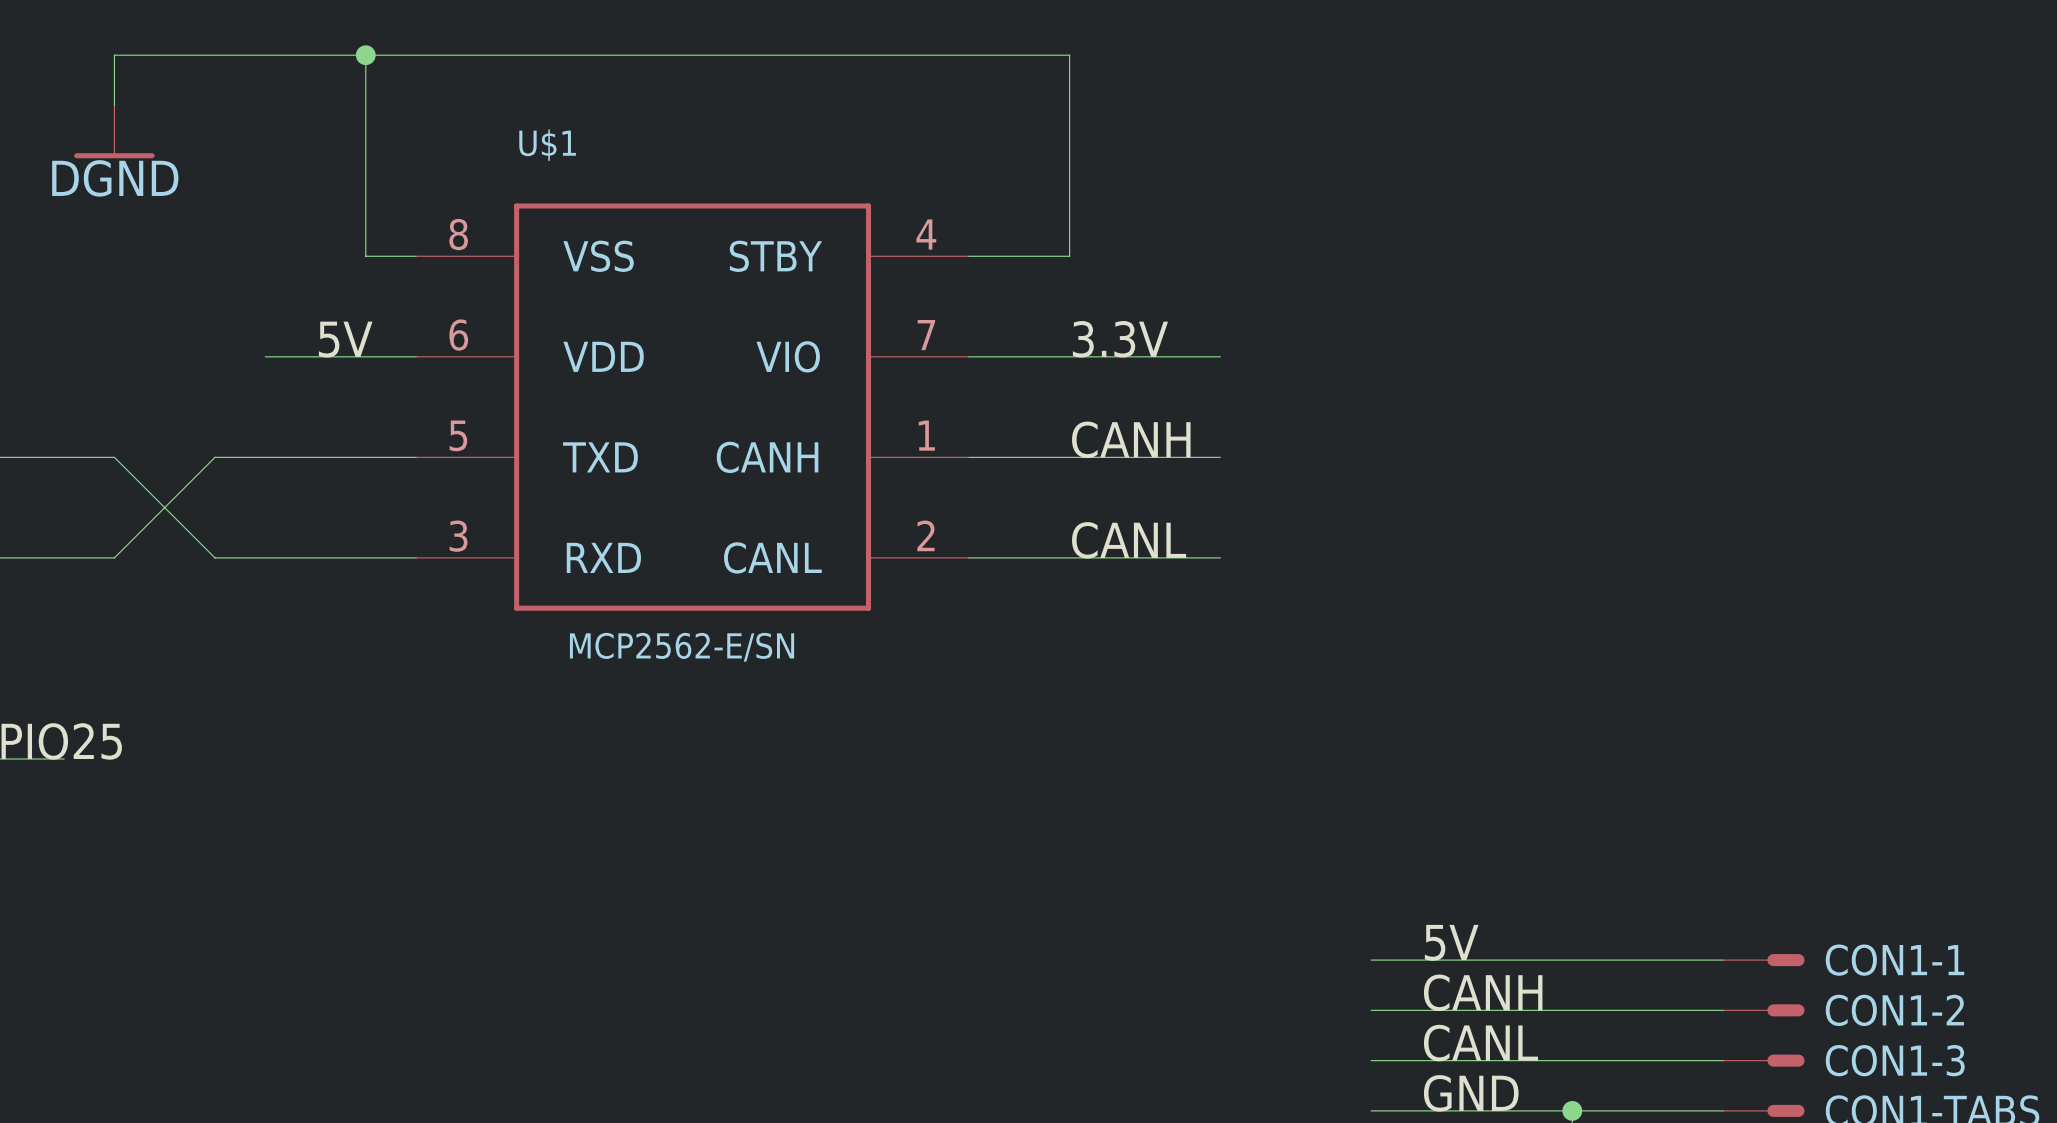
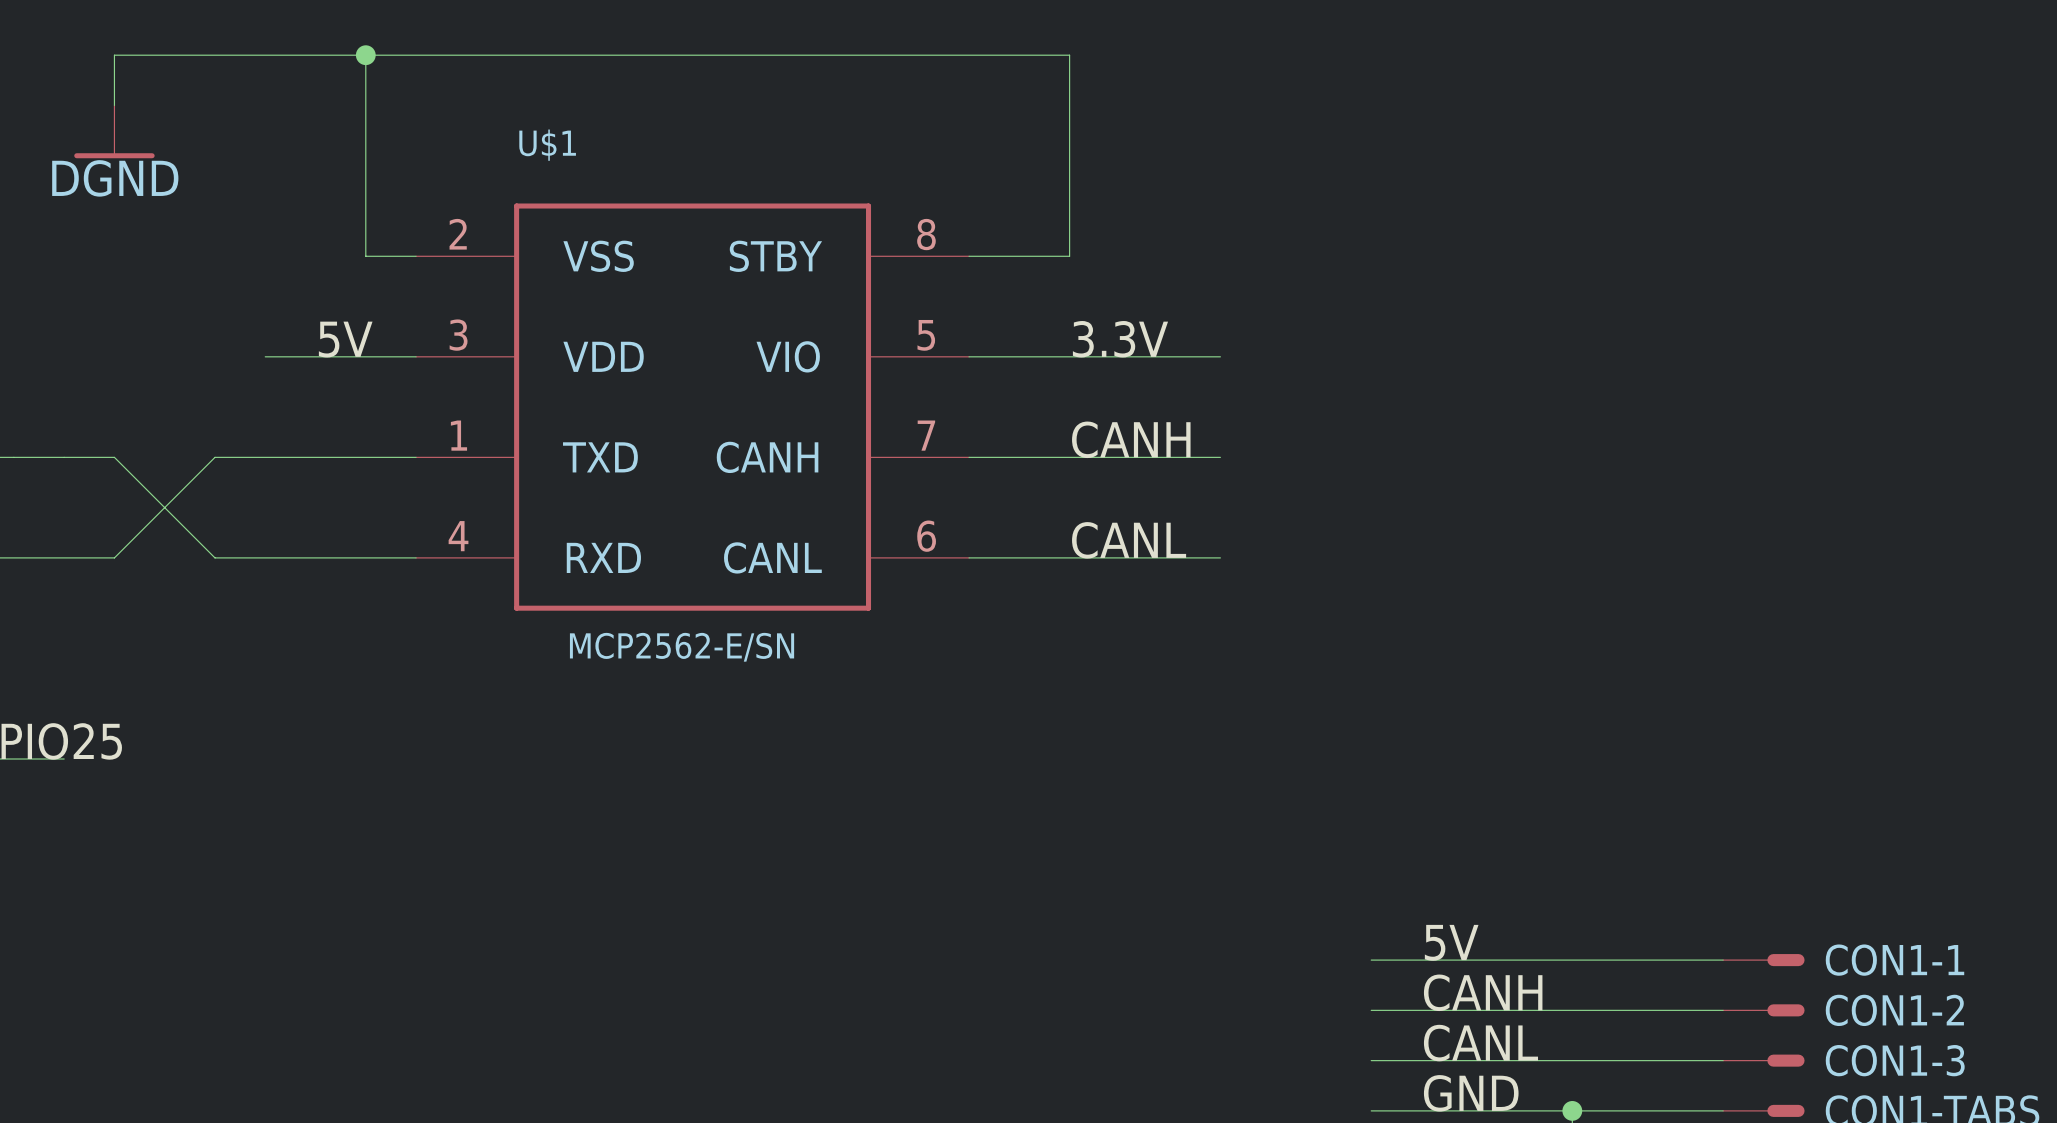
U$1 pin number: 8 (458, 234) -> 2 (458, 234)
U$1 pin number: 4 (926, 234) -> 8 (926, 234)
U$1 pin number: 6 (458, 335) -> 3 (458, 335)
U$1 pin number: 7 (926, 335) -> 5 (926, 335)
U$1 pin number: 5 (458, 435) -> 1 (458, 435)
U$1 pin number: 1 (926, 435) -> 7 (926, 435)
U$1 pin number: 2 (925, 535) -> 6 (926, 536)
U$1 pin number: 3 (458, 536) -> 4 (458, 536)

